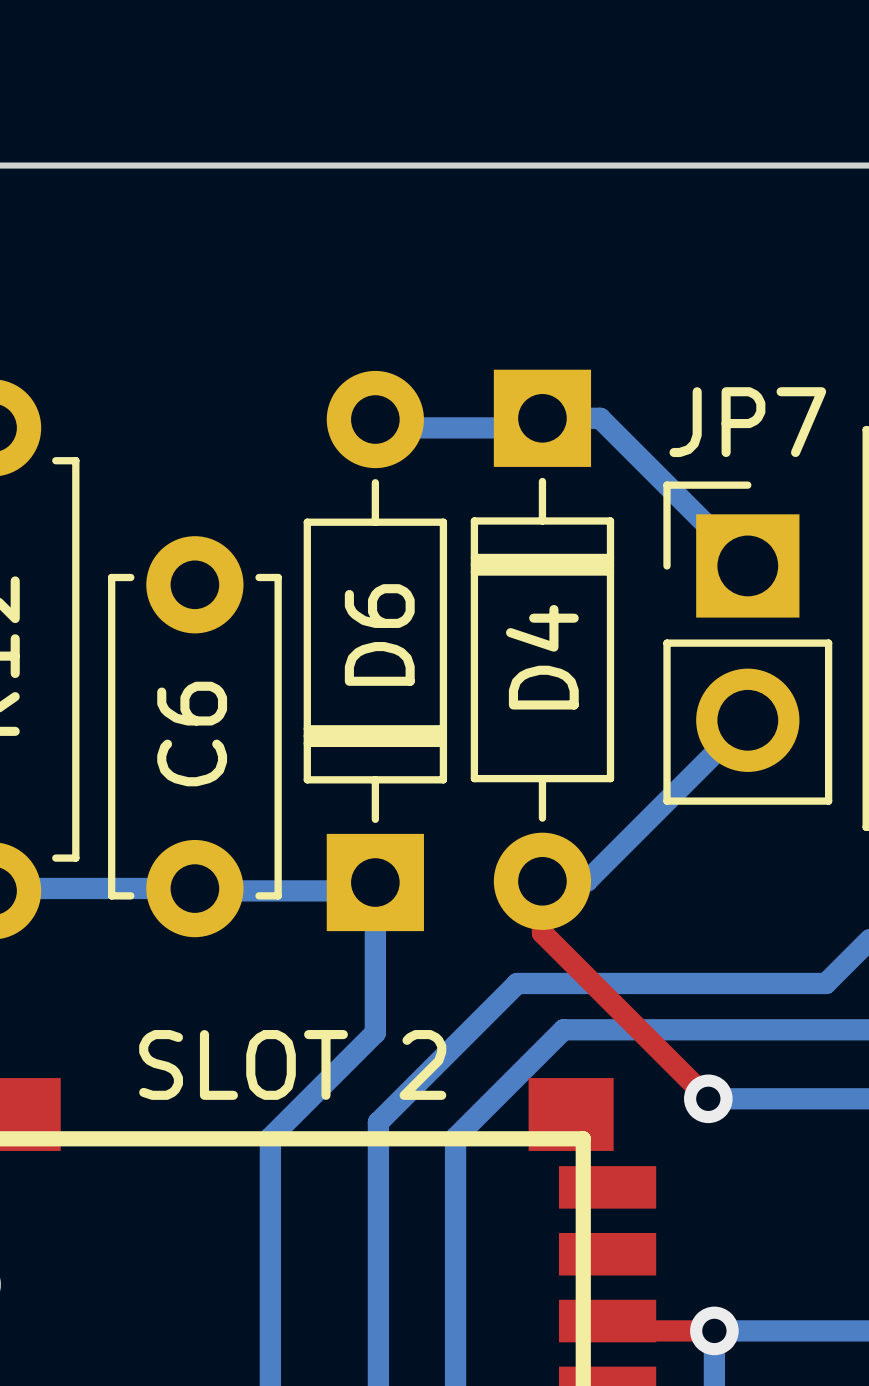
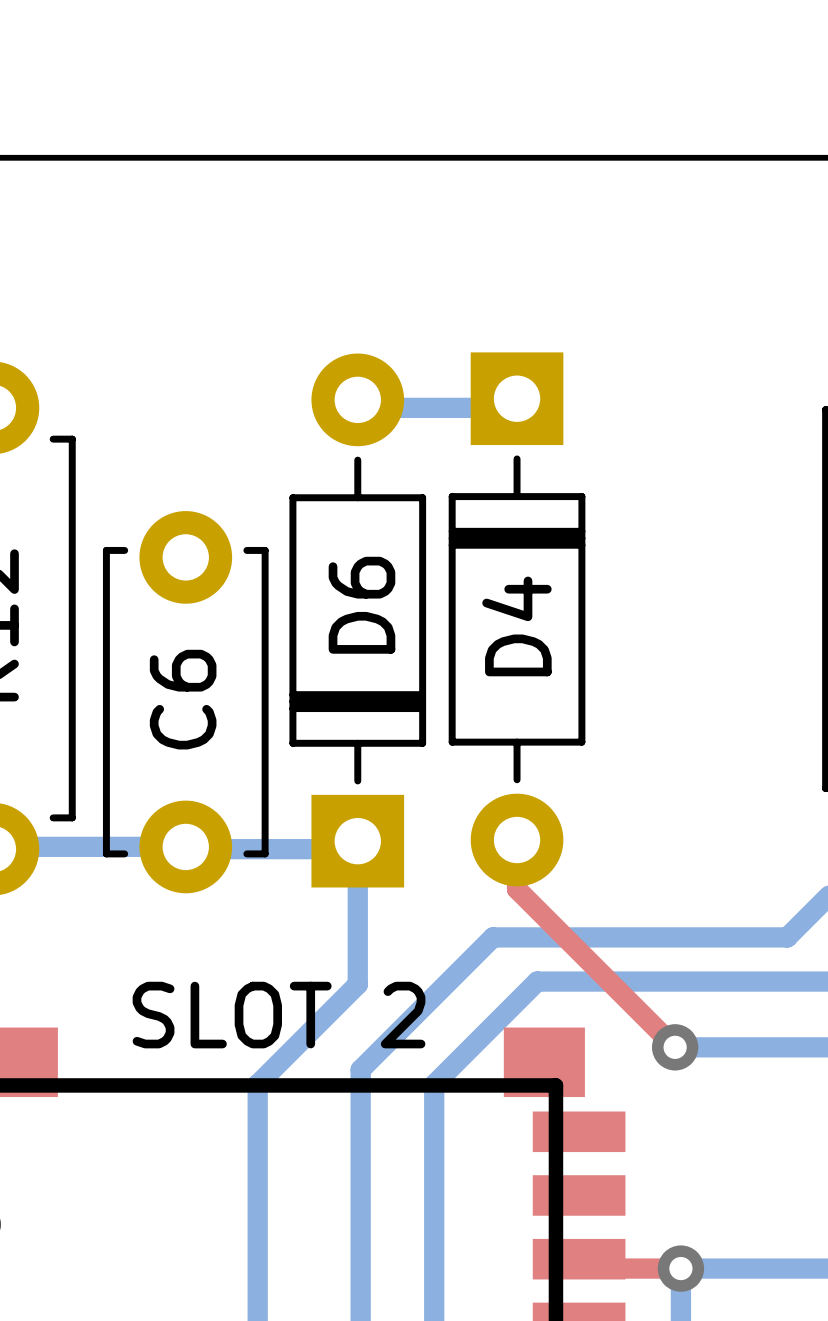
bottom track: (542, 418) (600, 418) (747, 565) -> none
JP7: (747, 643) -> none
bottom track: (747, 720) (586, 881) (542, 881) -> none

